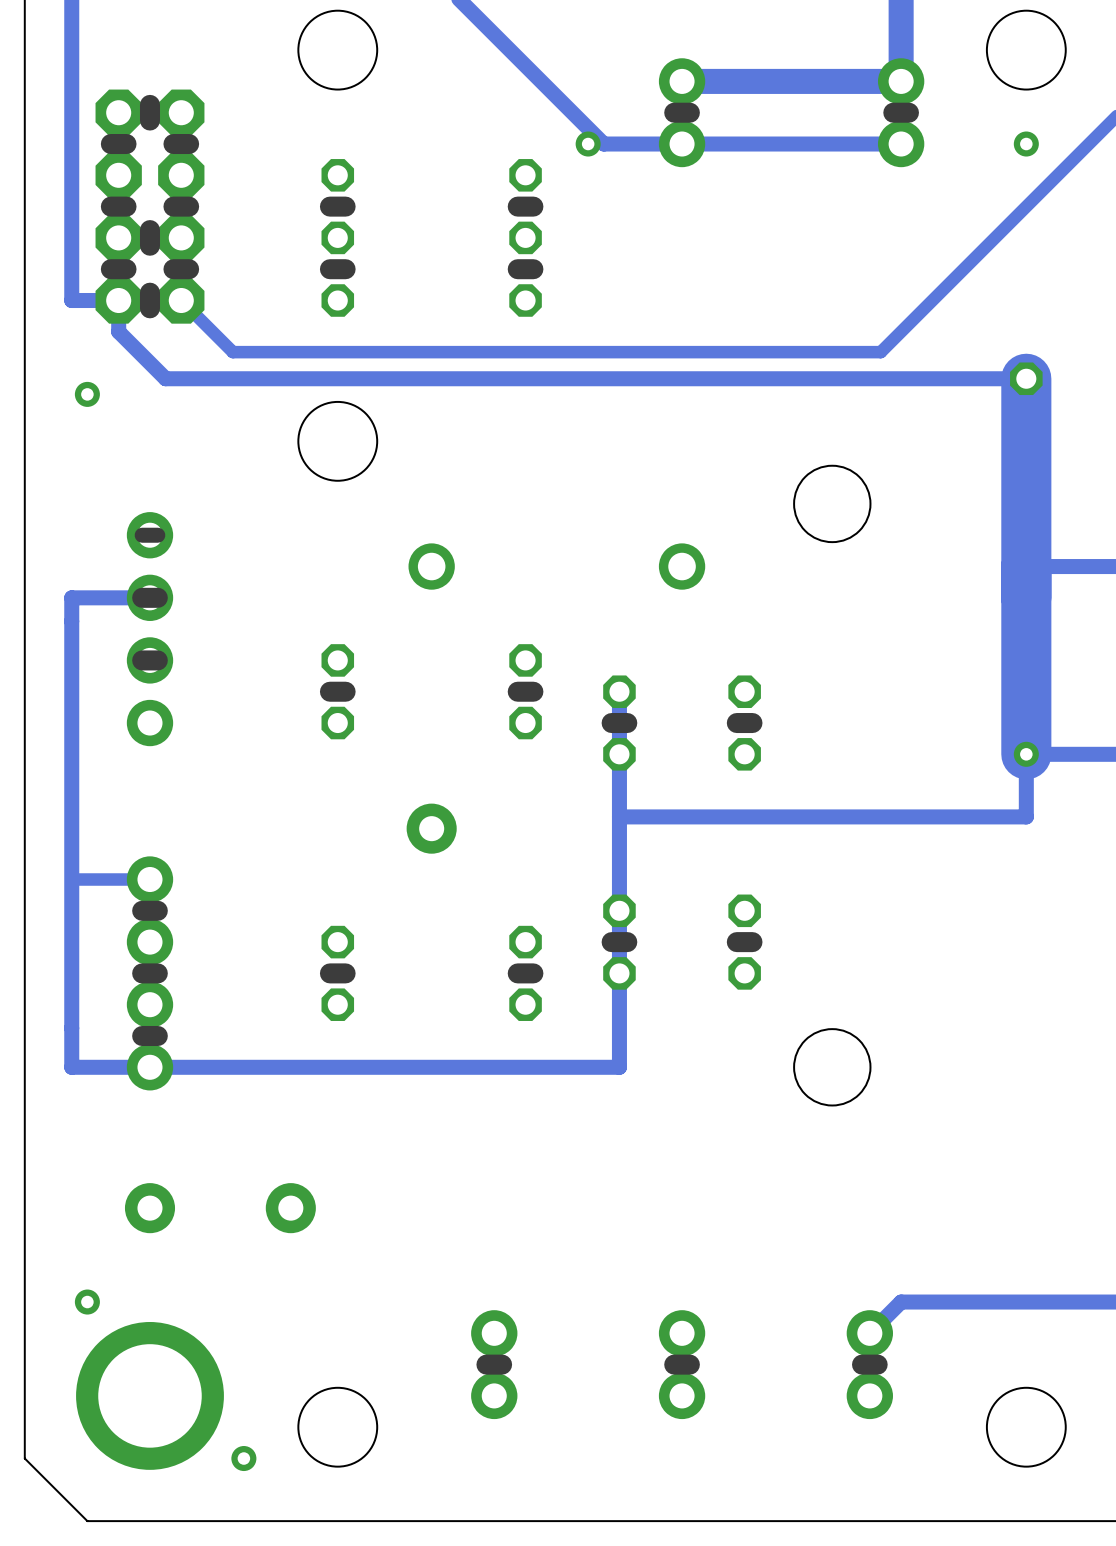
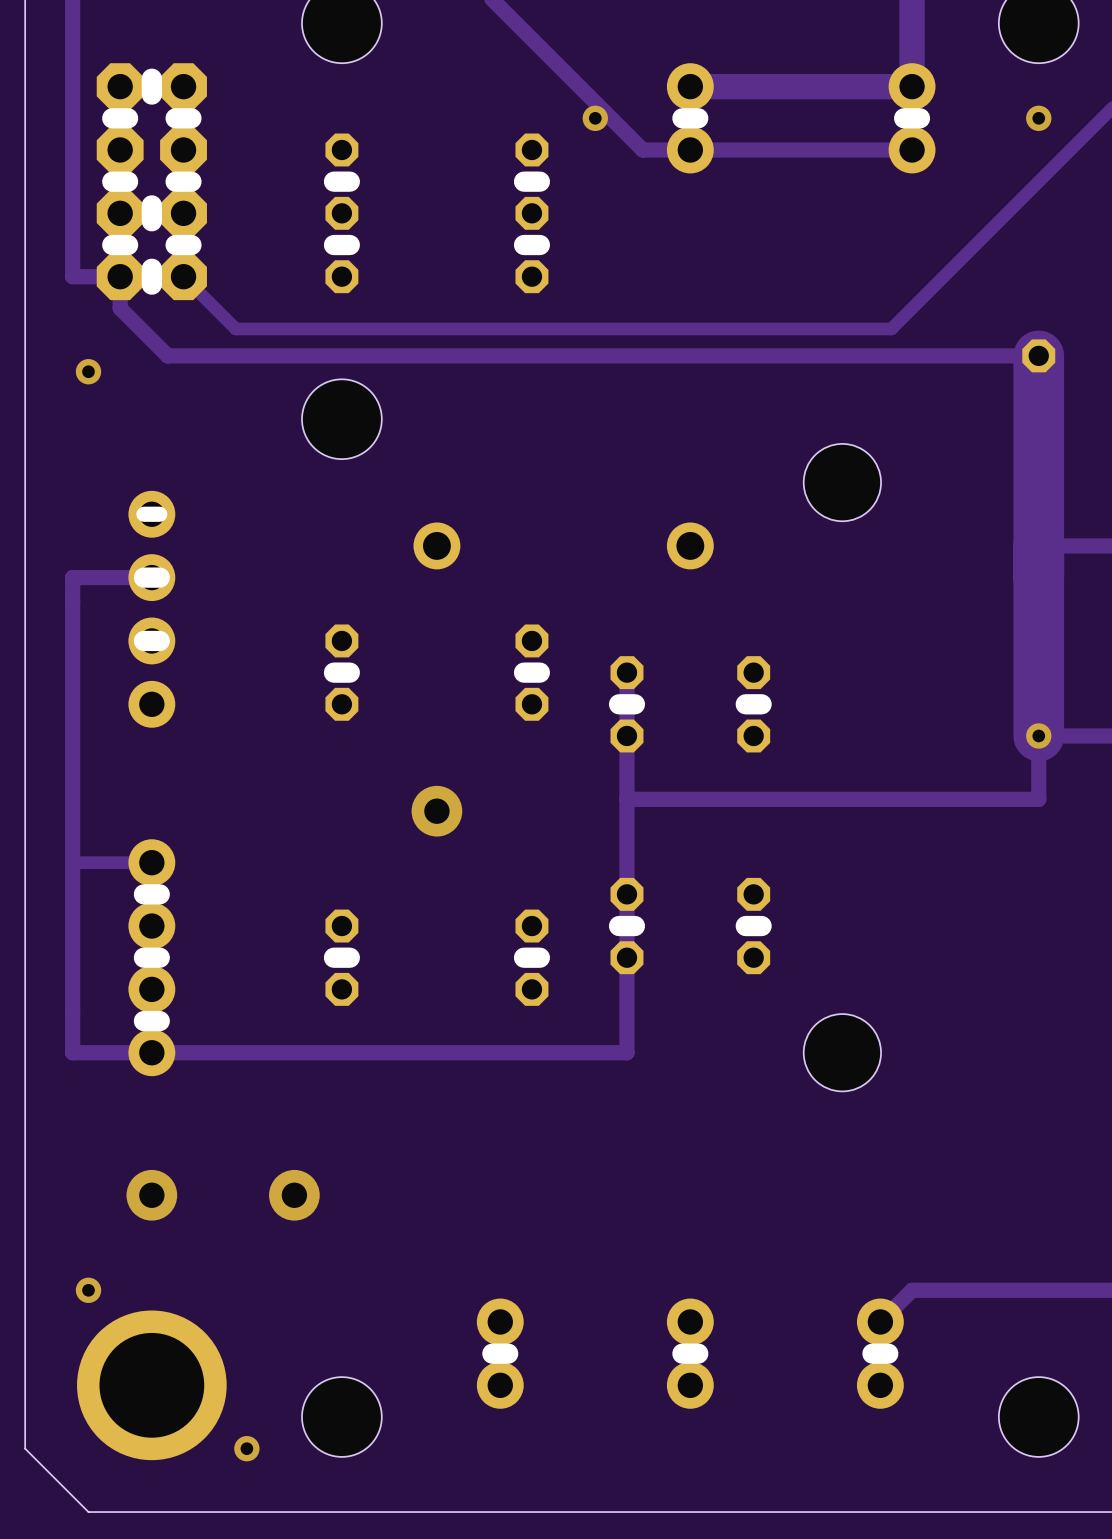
track: (901, 81) (682, 81) -> (912, 54) (912, 86) (690, 86)
part position: (682, 112) -> (690, 118)
line: (689, 112) (674, 112) -> (698, 118) (682, 118)
part position: (901, 112) -> (912, 118)
line: (908, 112) (893, 112) -> (919, 118) (904, 118)
track: (901, 144) (603, 144) -> (912, 149) (642, 149) (611, 118)

